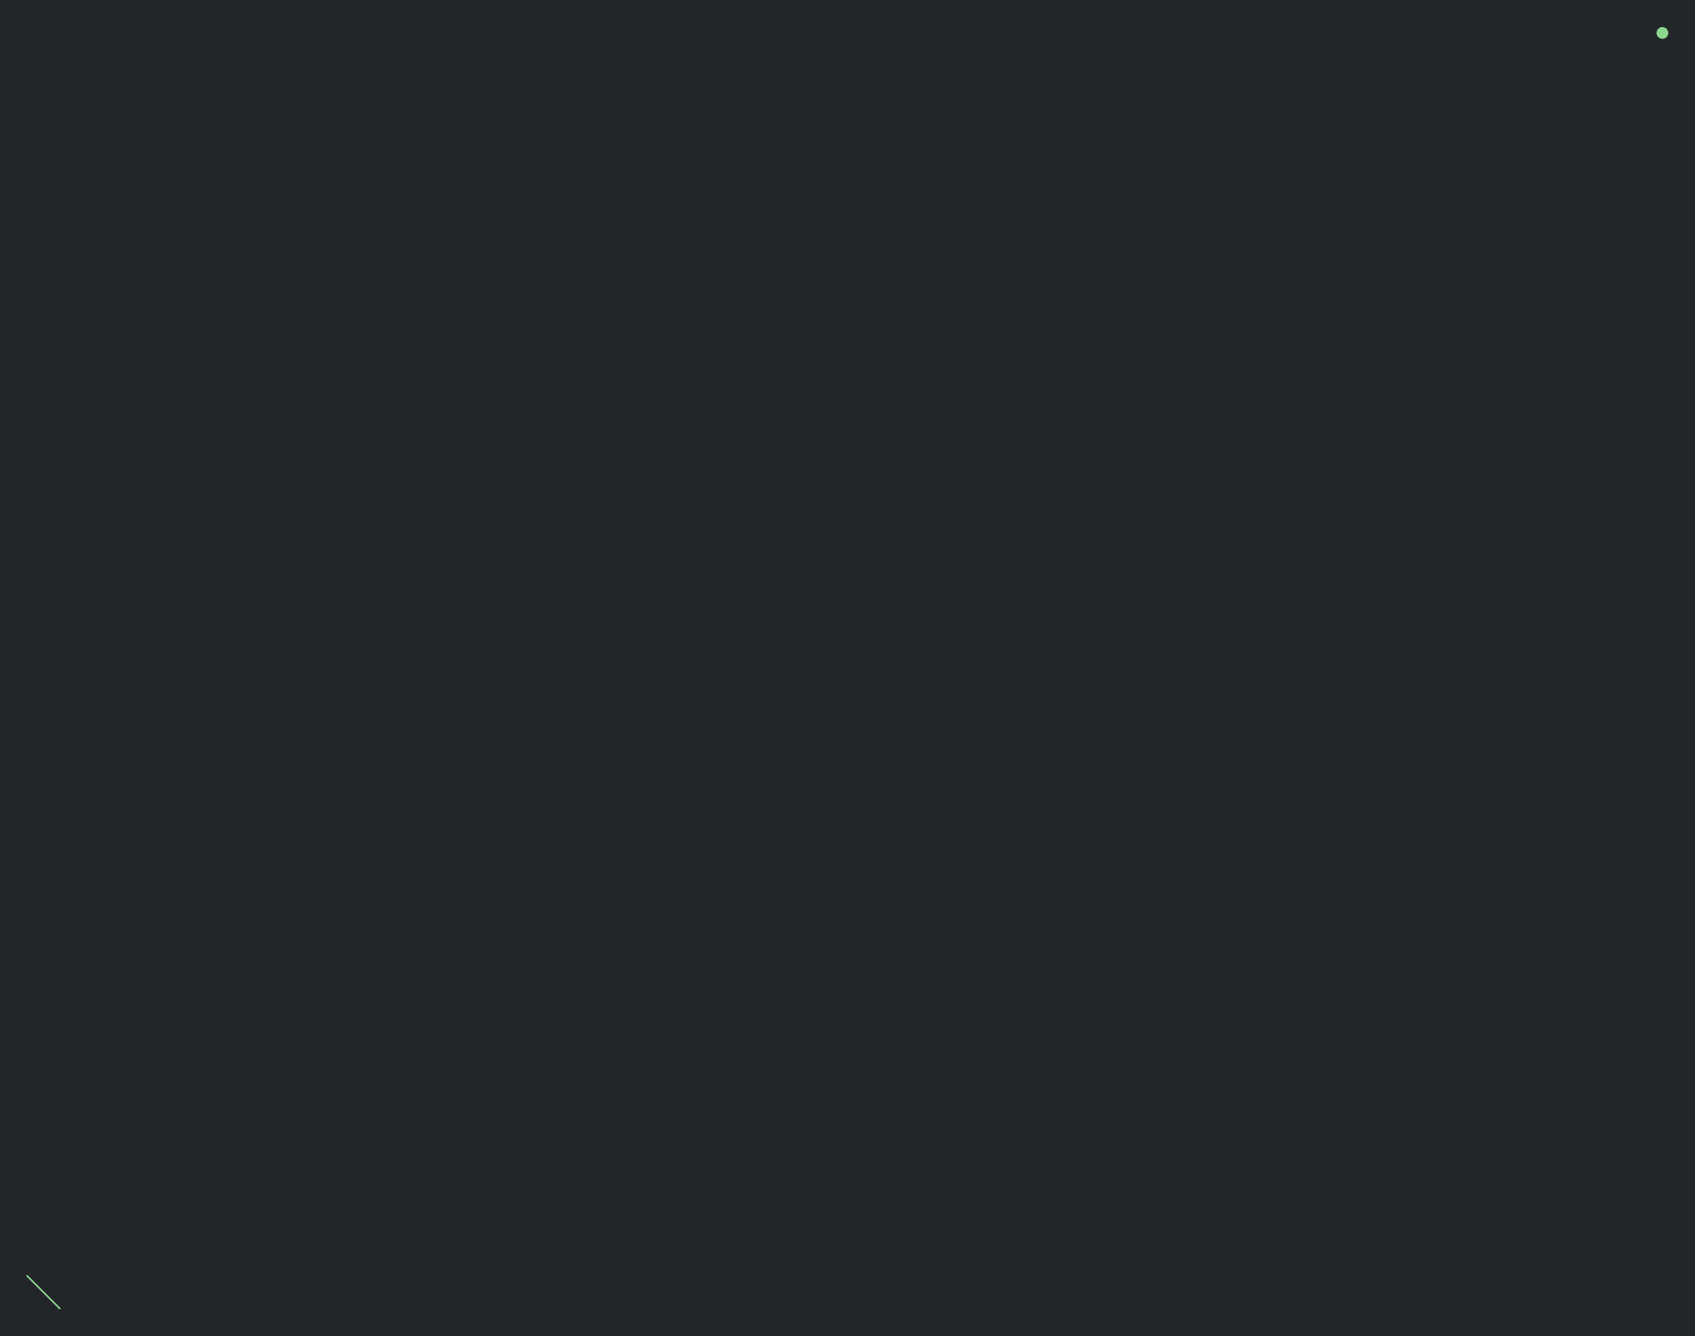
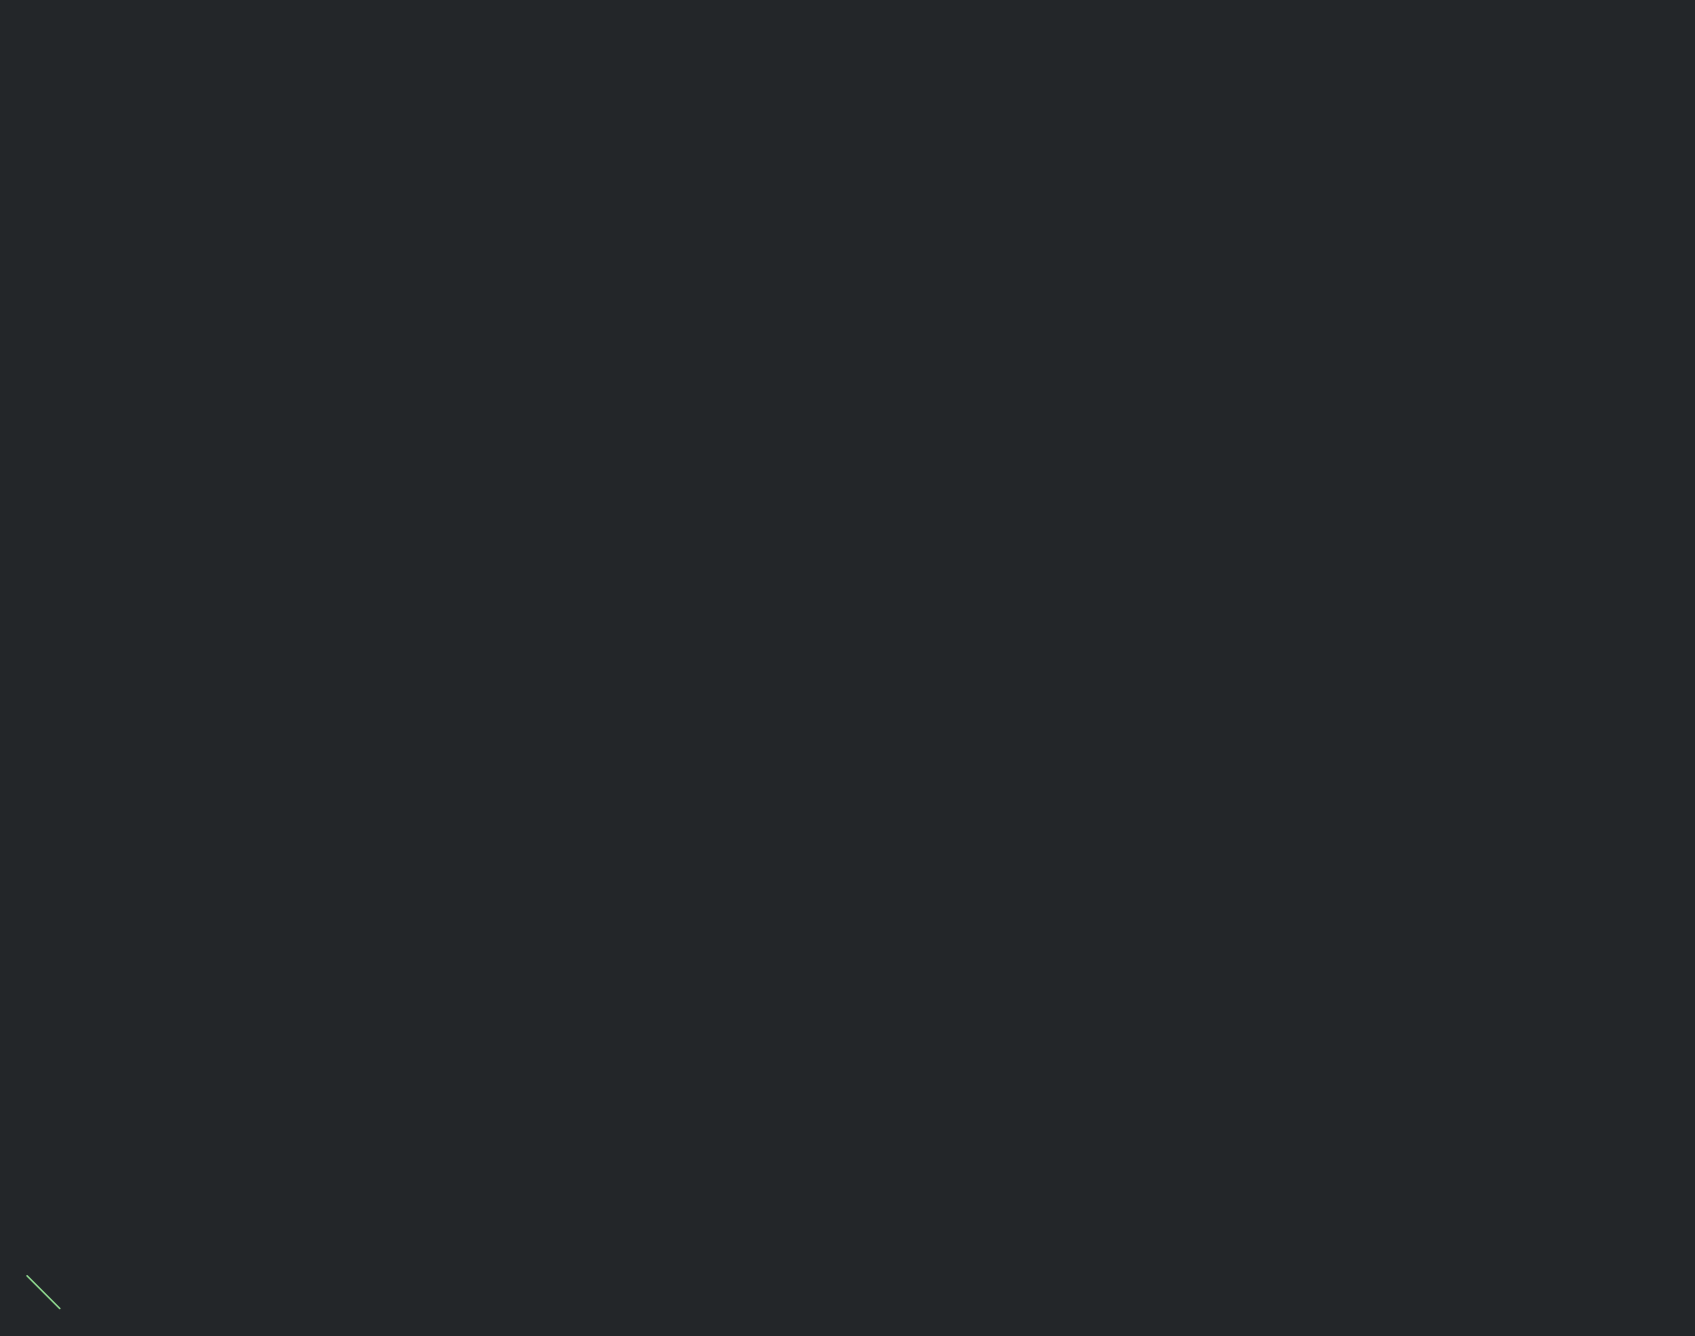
junction: (1662, 32) -> none

